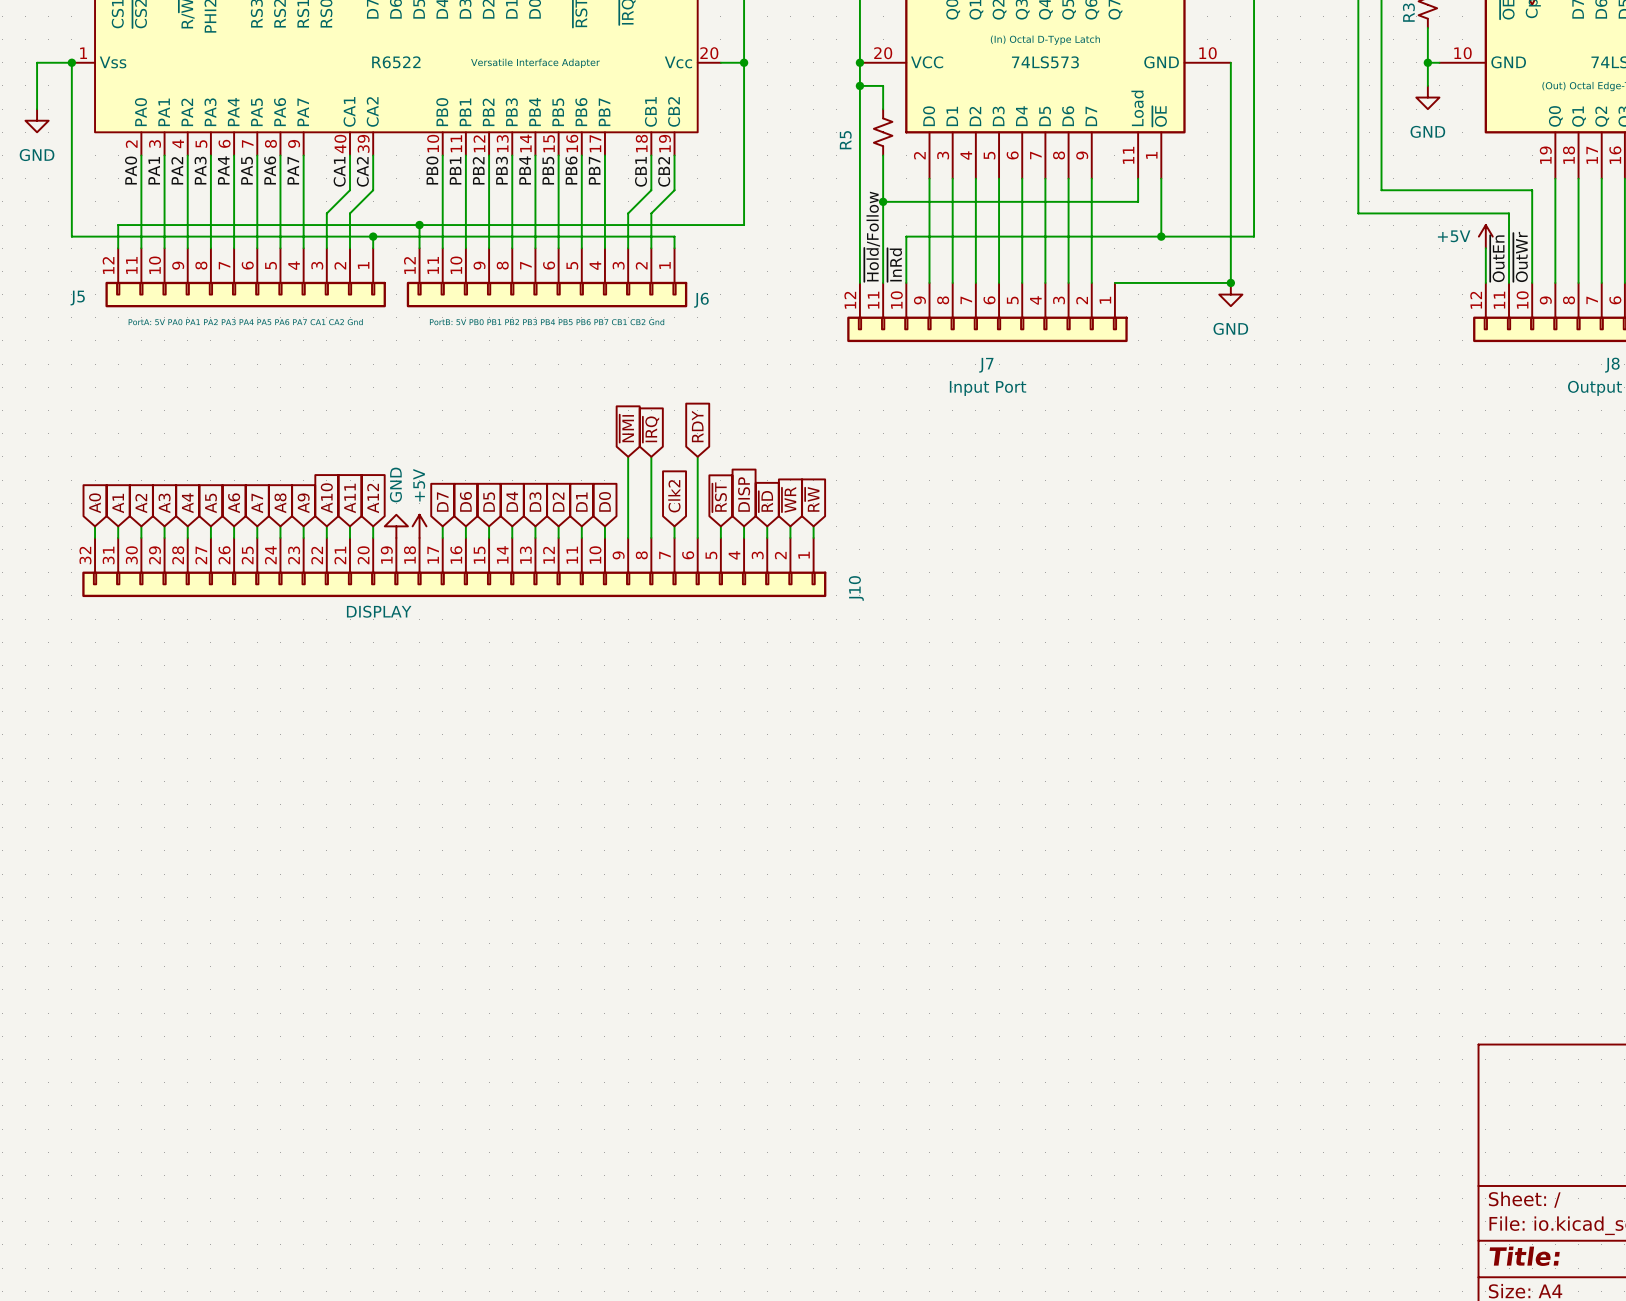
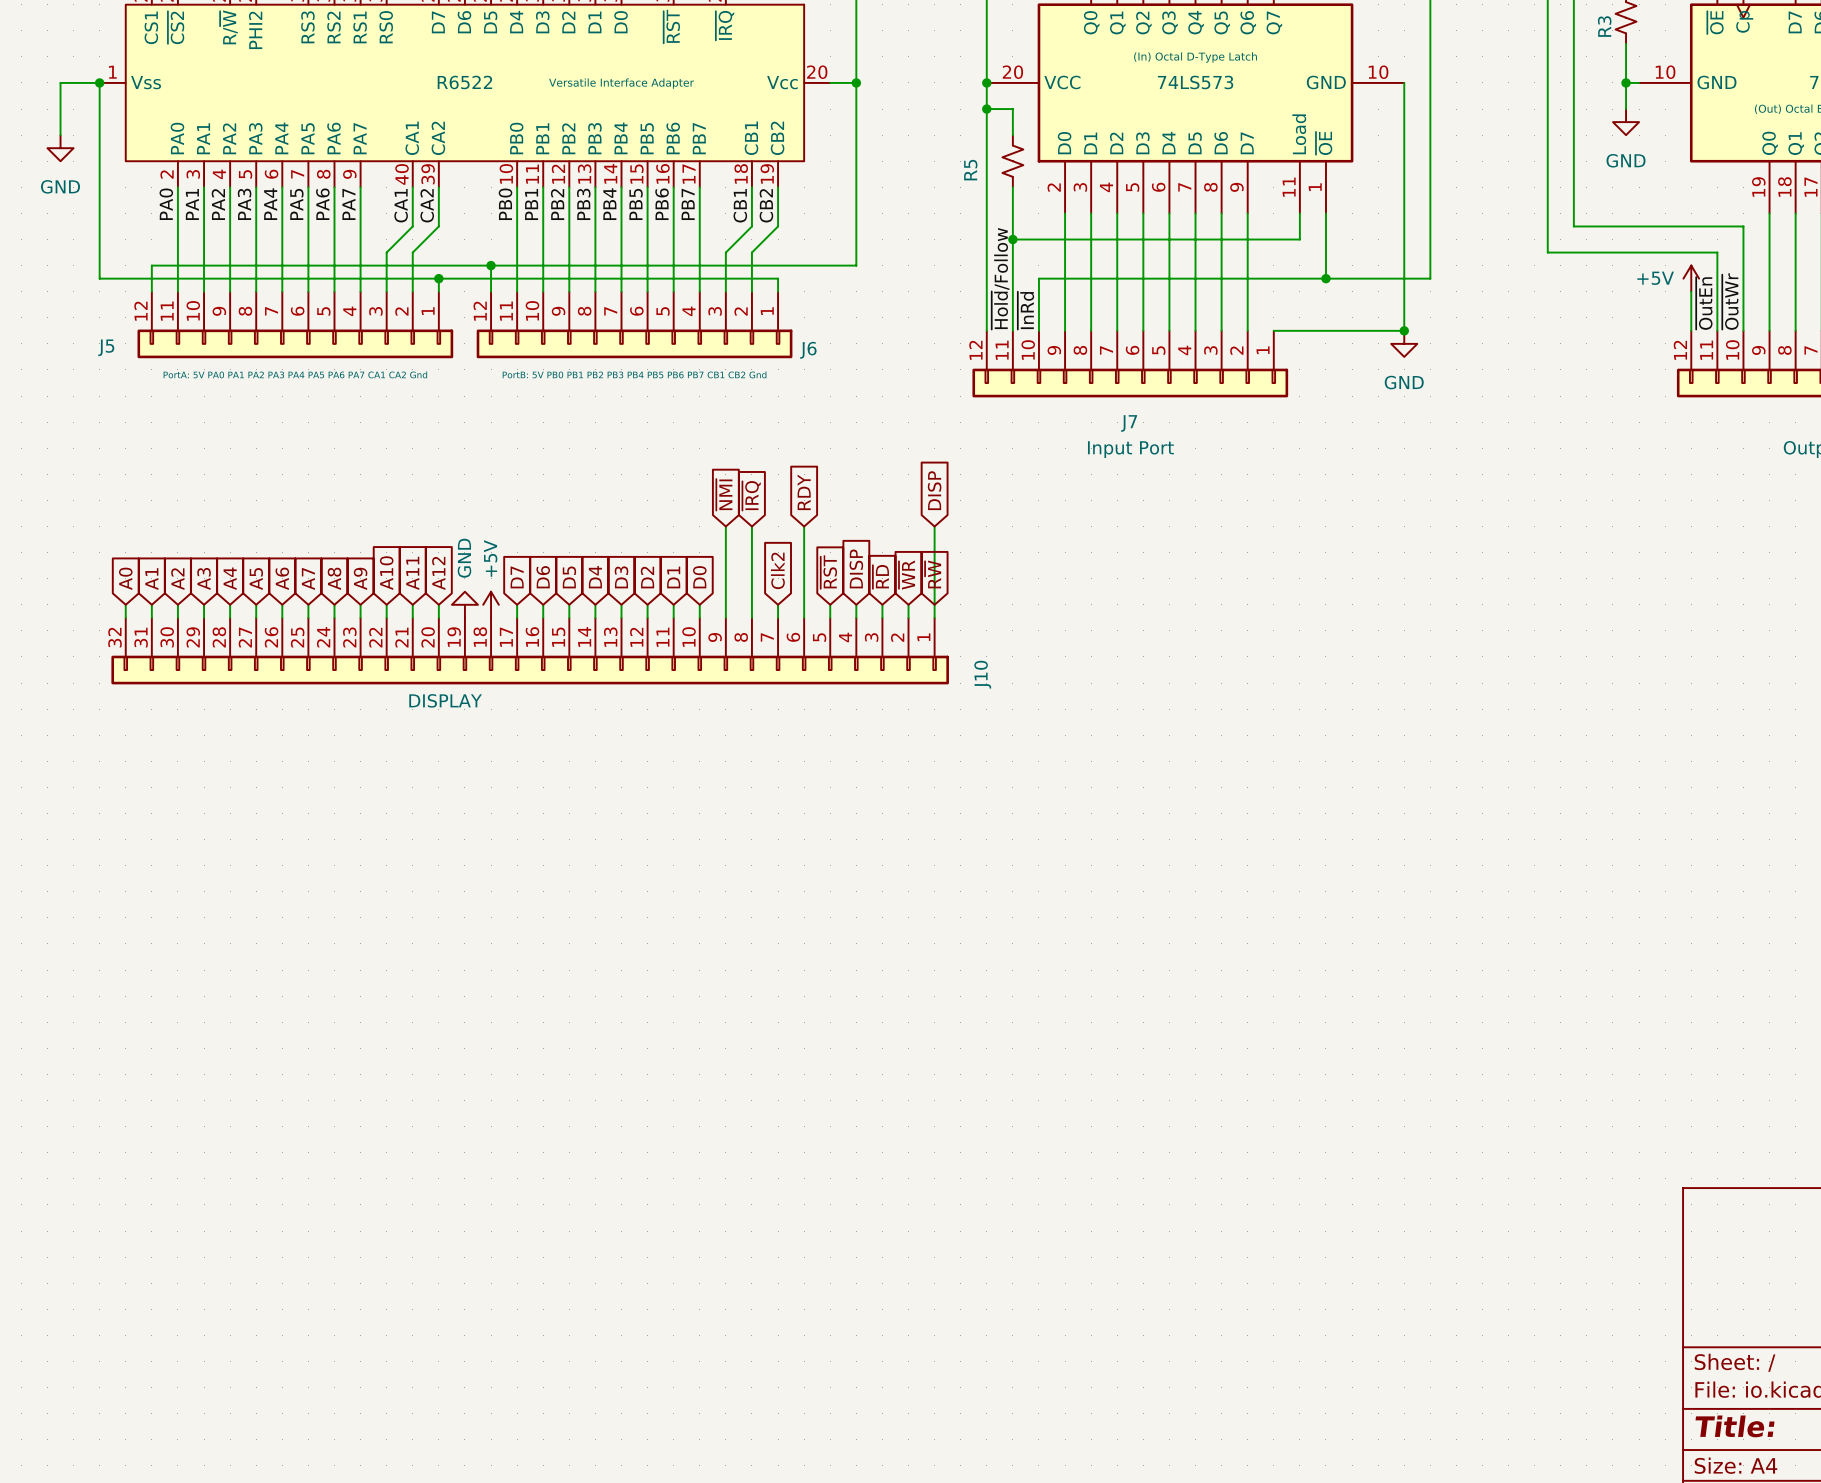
global label: none -> DISP (934, 490)
wire: none -> (934, 526) (934, 604)

